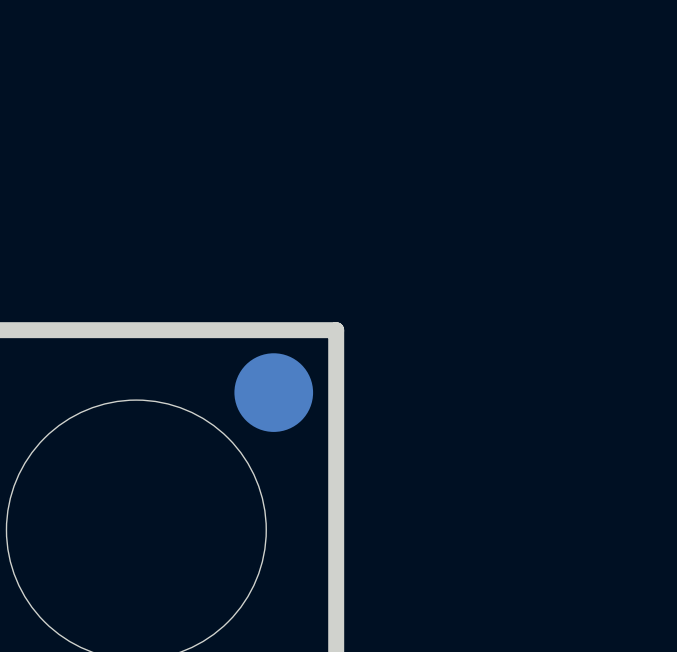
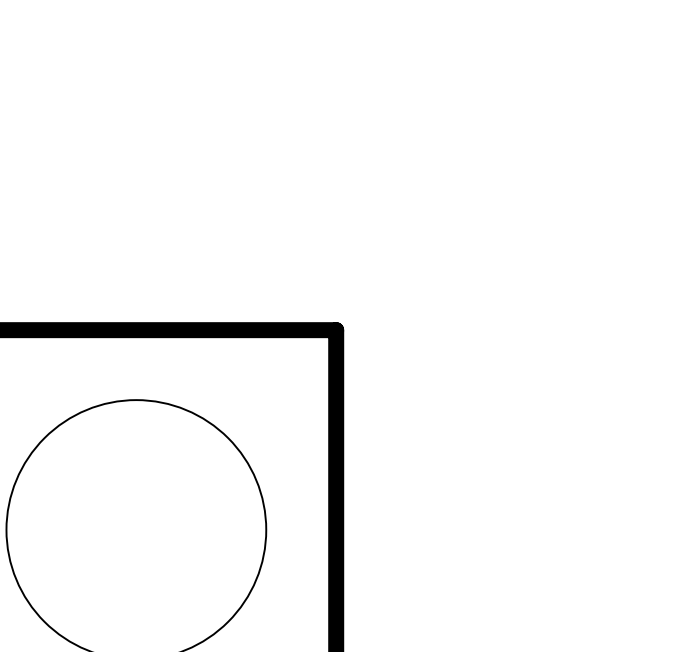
part: (273, 392) -> none

